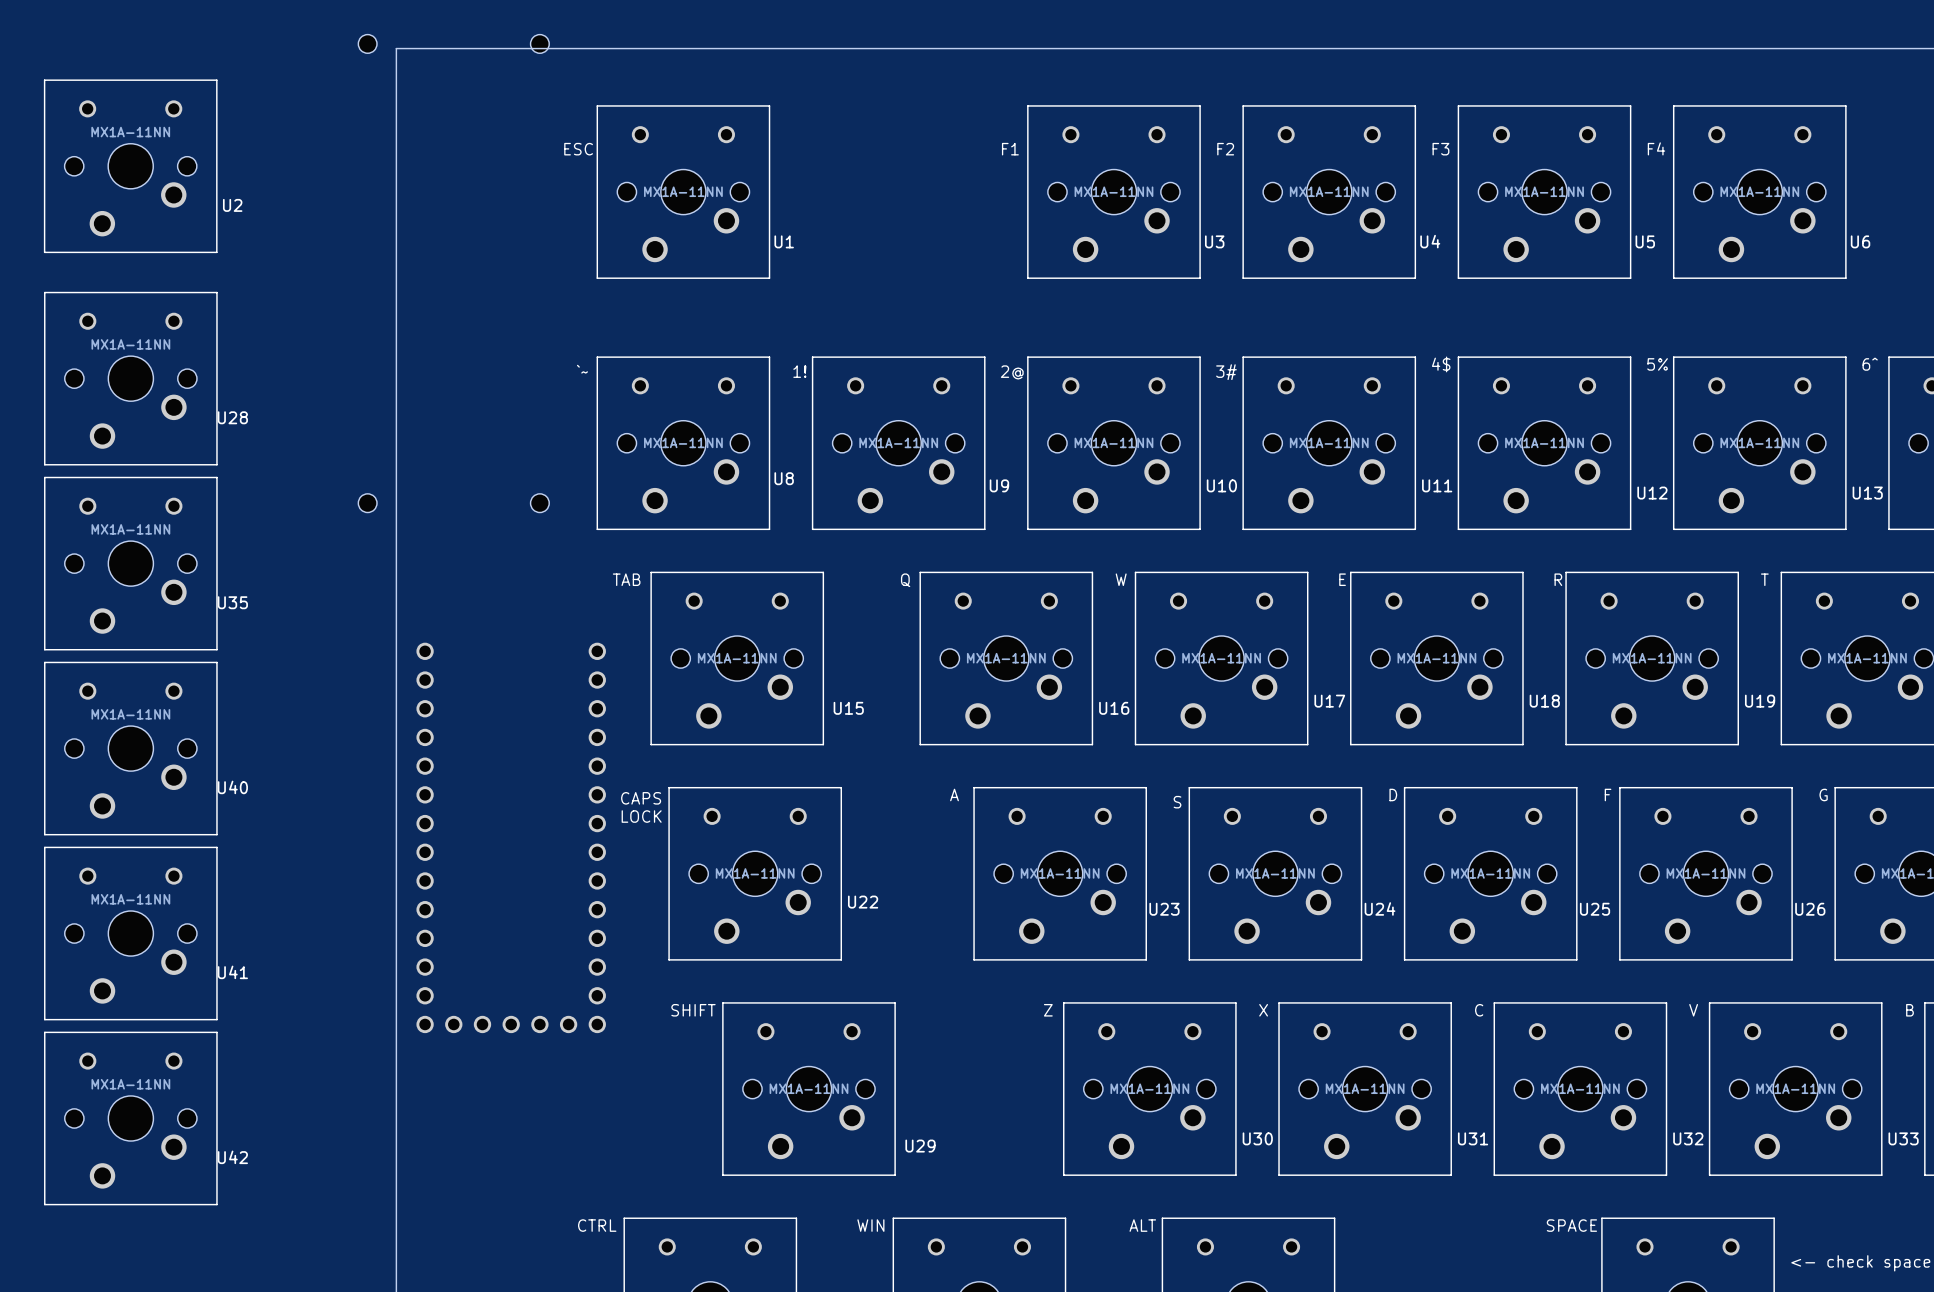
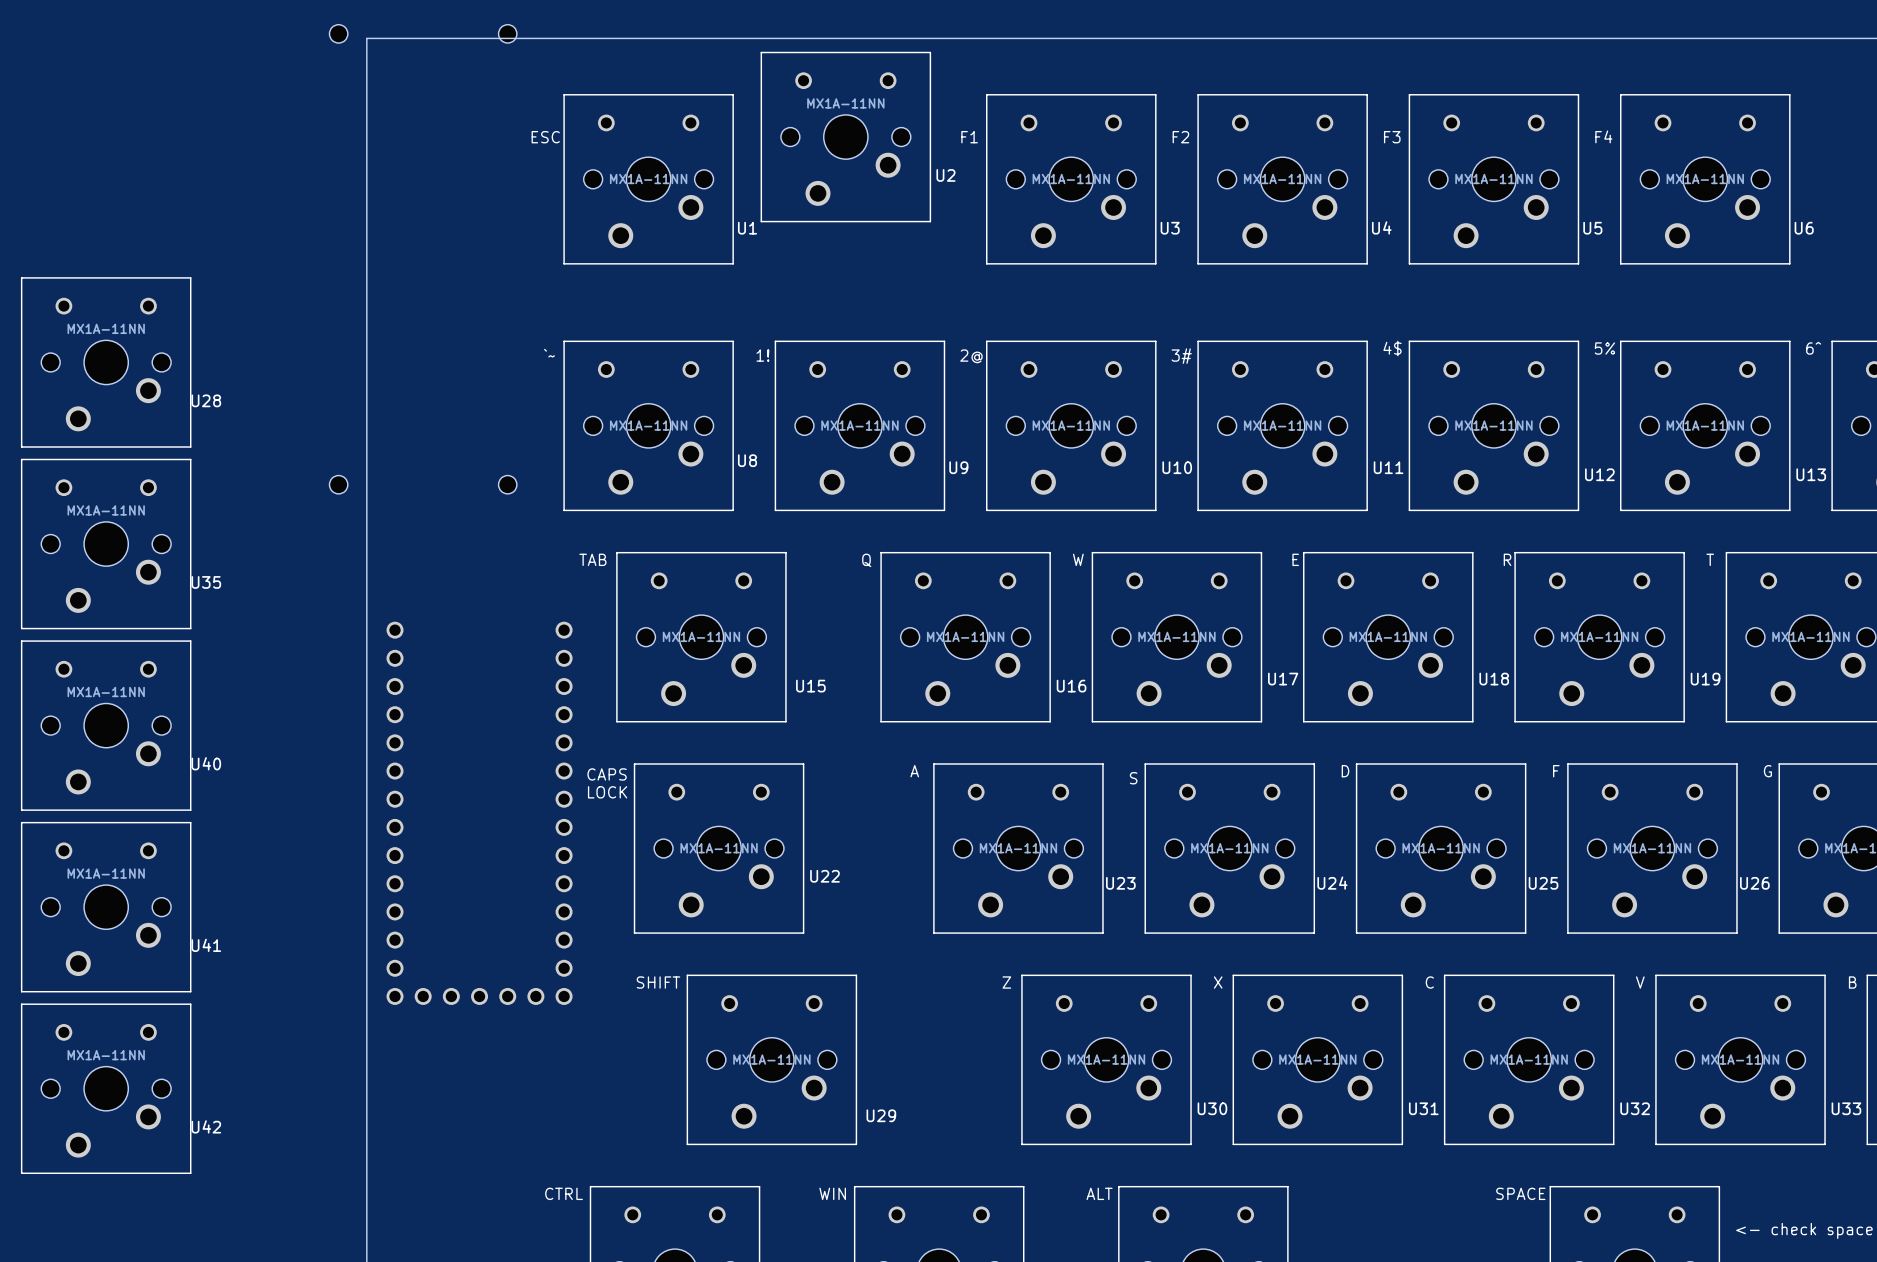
U2 position: (130, 166) -> (845, 137)

